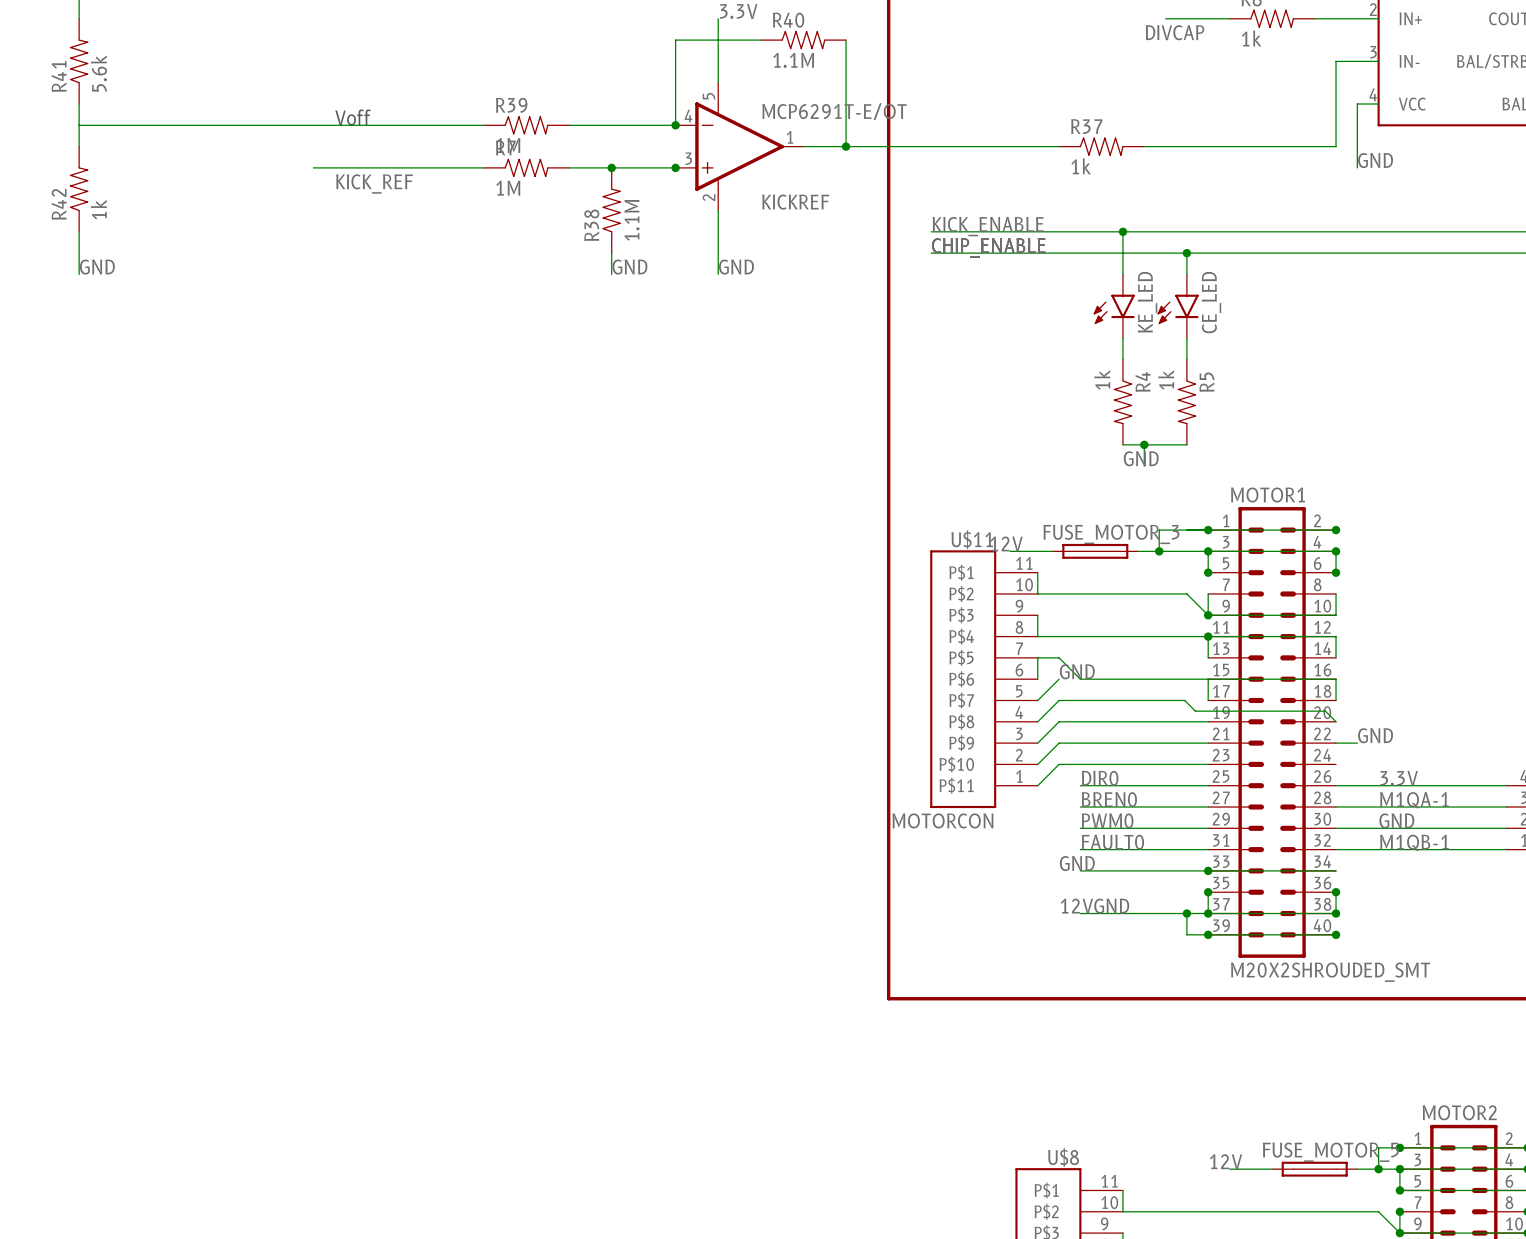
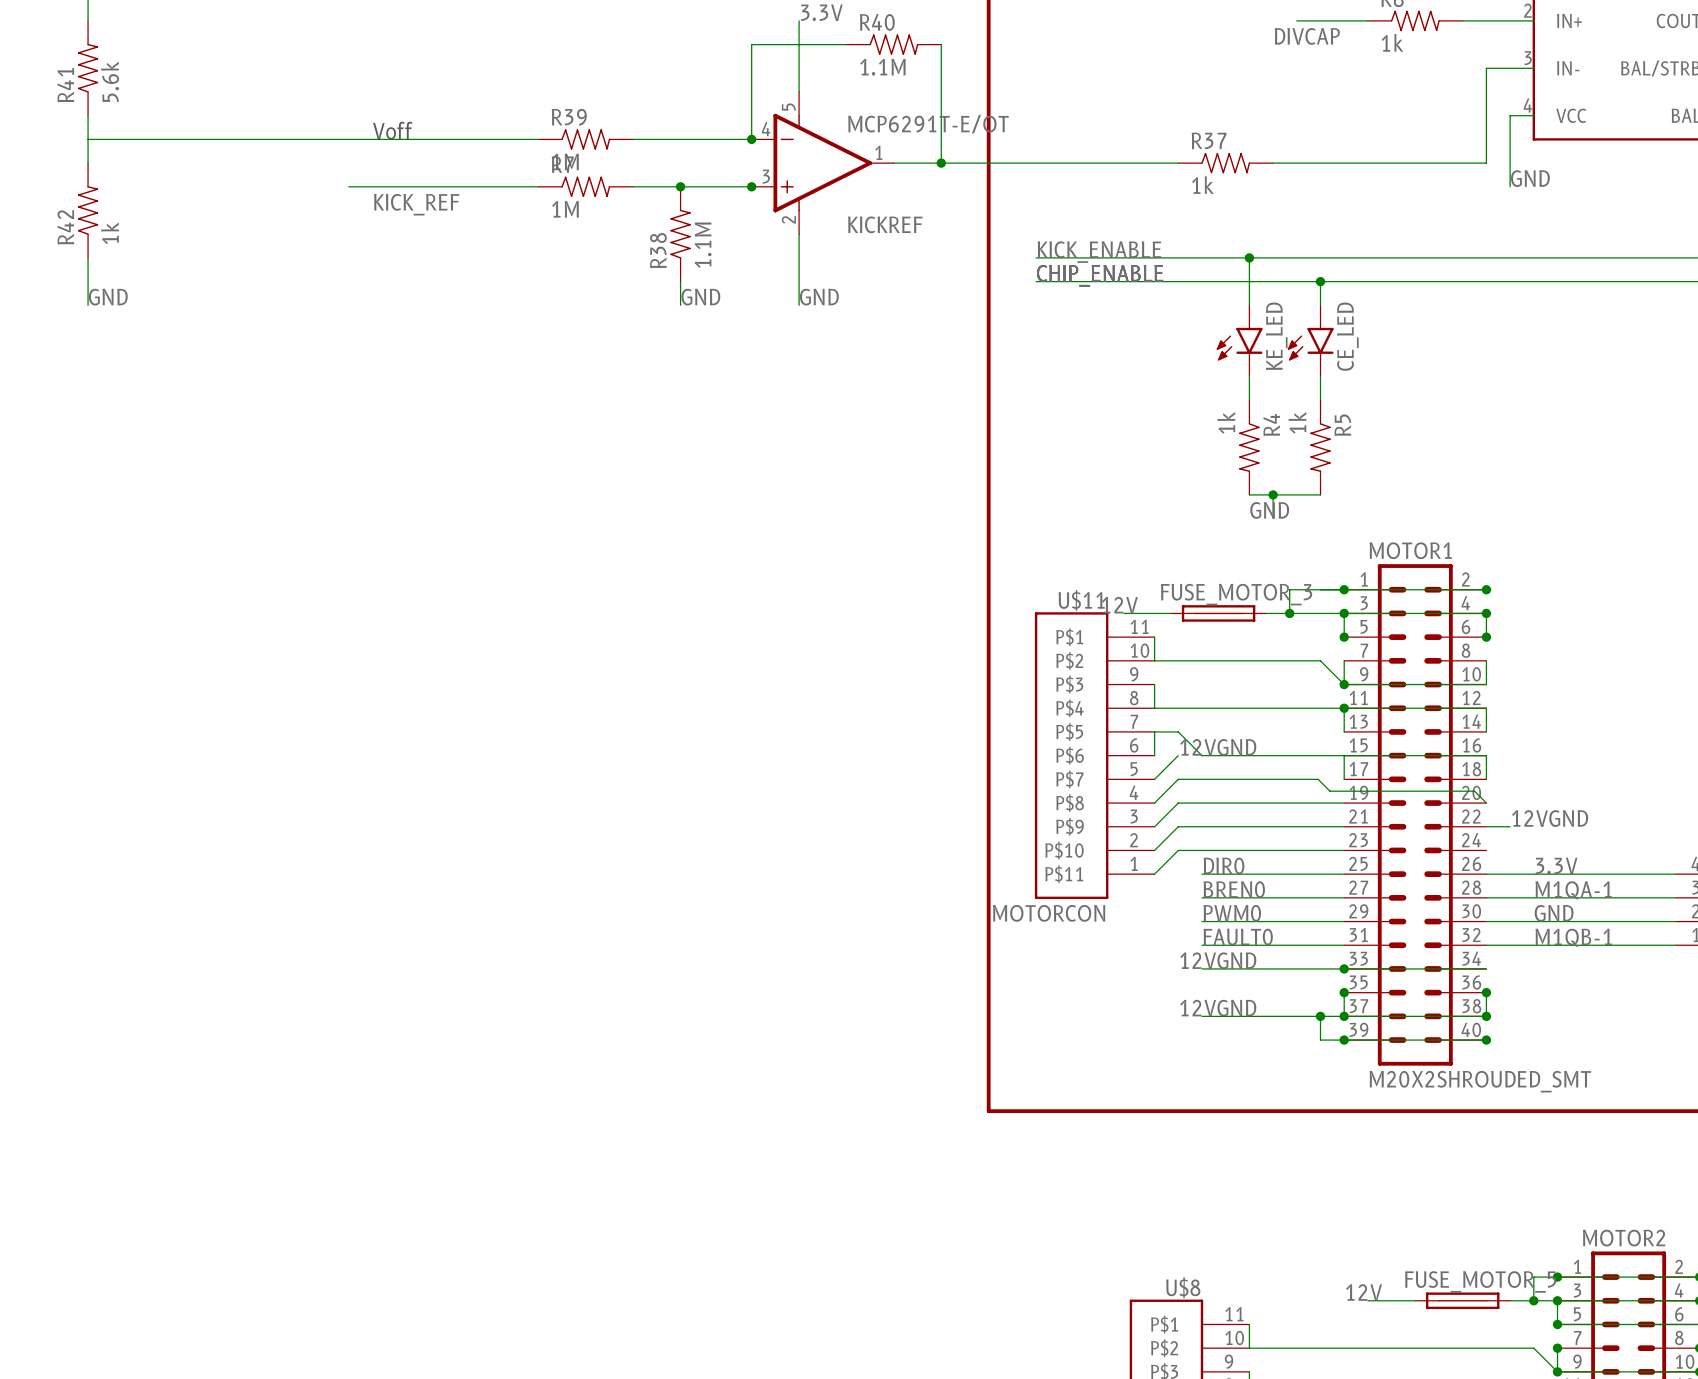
label: GND (1077, 671) -> 12VGND (1218, 747)
label: GND (1375, 735) -> 12VGND (1550, 818)
label: GND (1077, 863) -> 12VGND (1218, 960)

